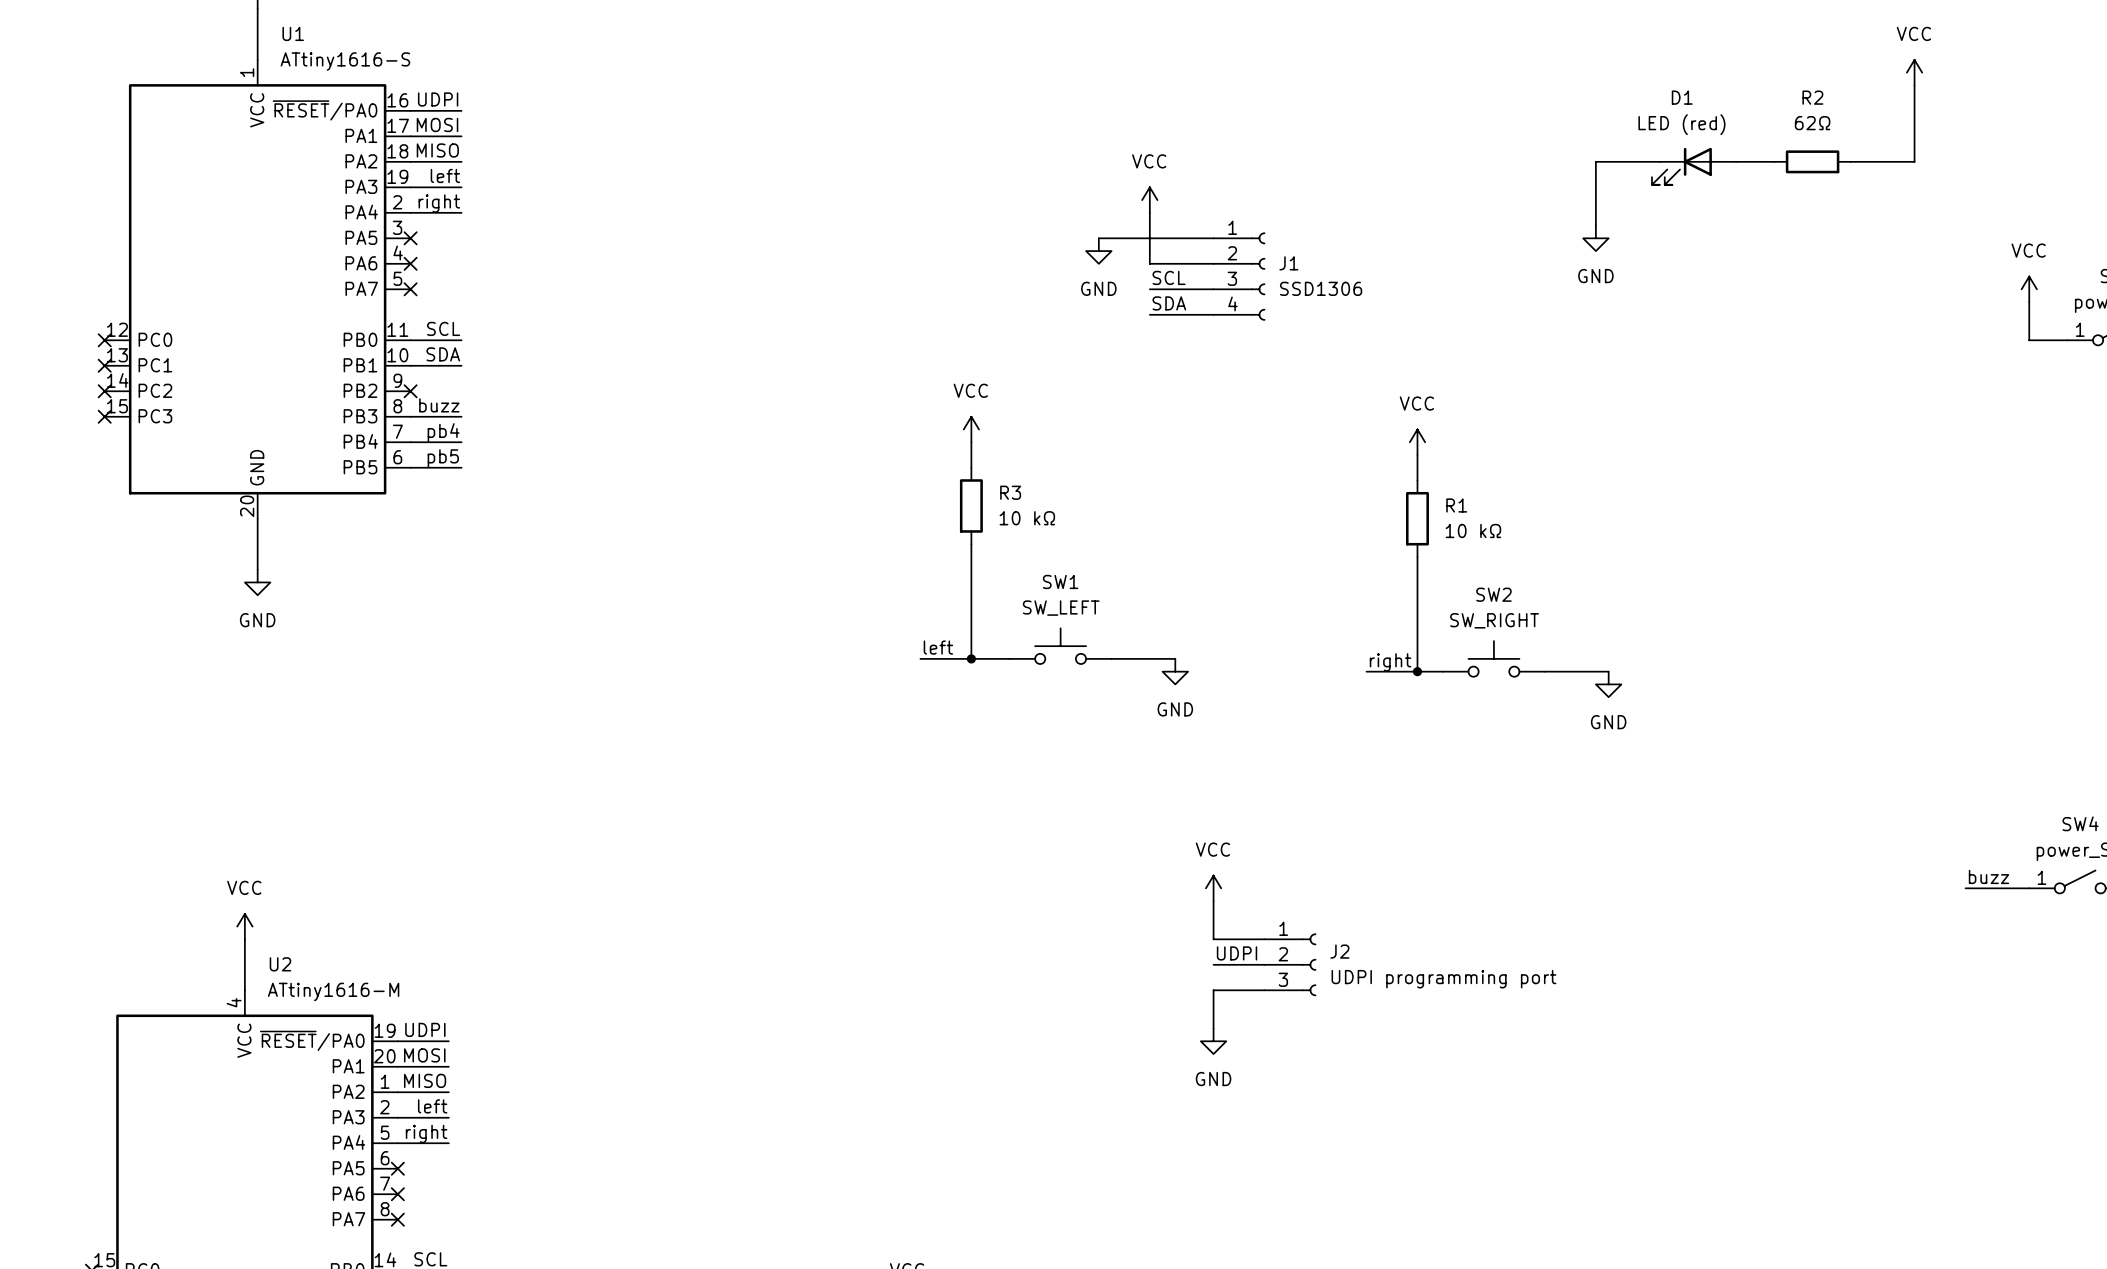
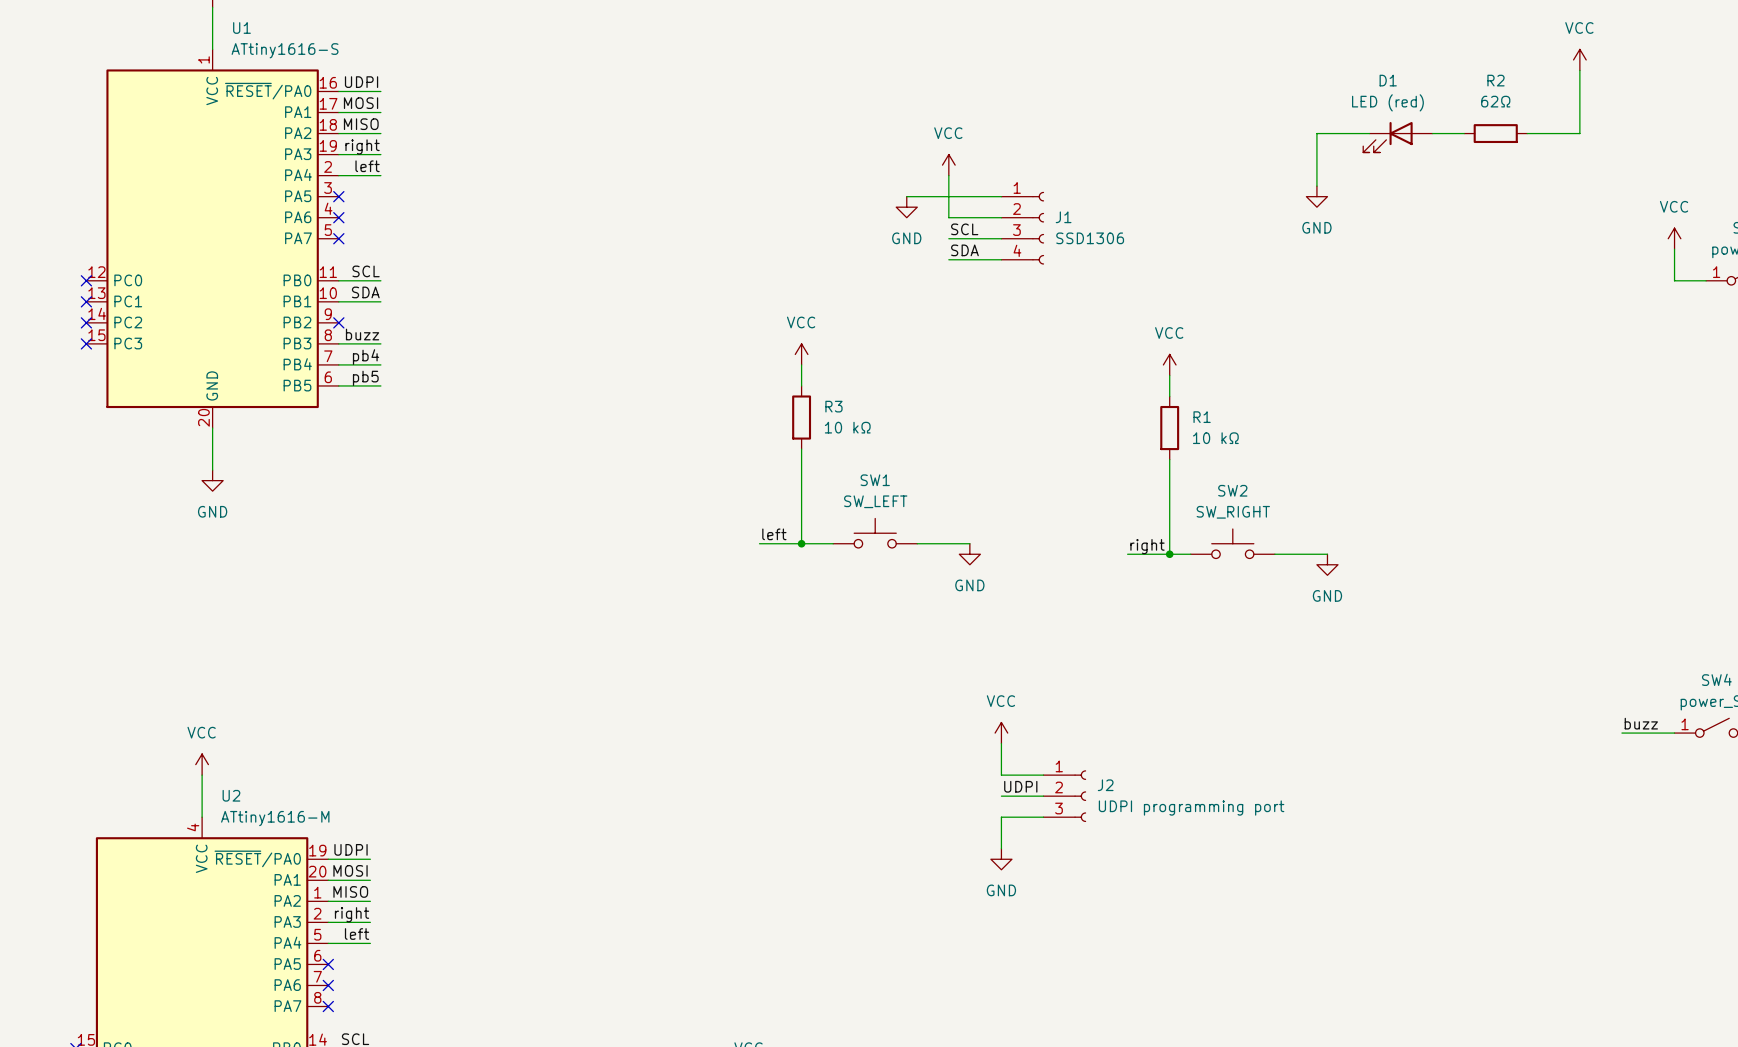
label: left (445, 175) -> right (362, 146)
label: right (439, 203) -> left (367, 166)
label: left (432, 1106) -> right (352, 914)
label: right (426, 1133) -> left (357, 934)

